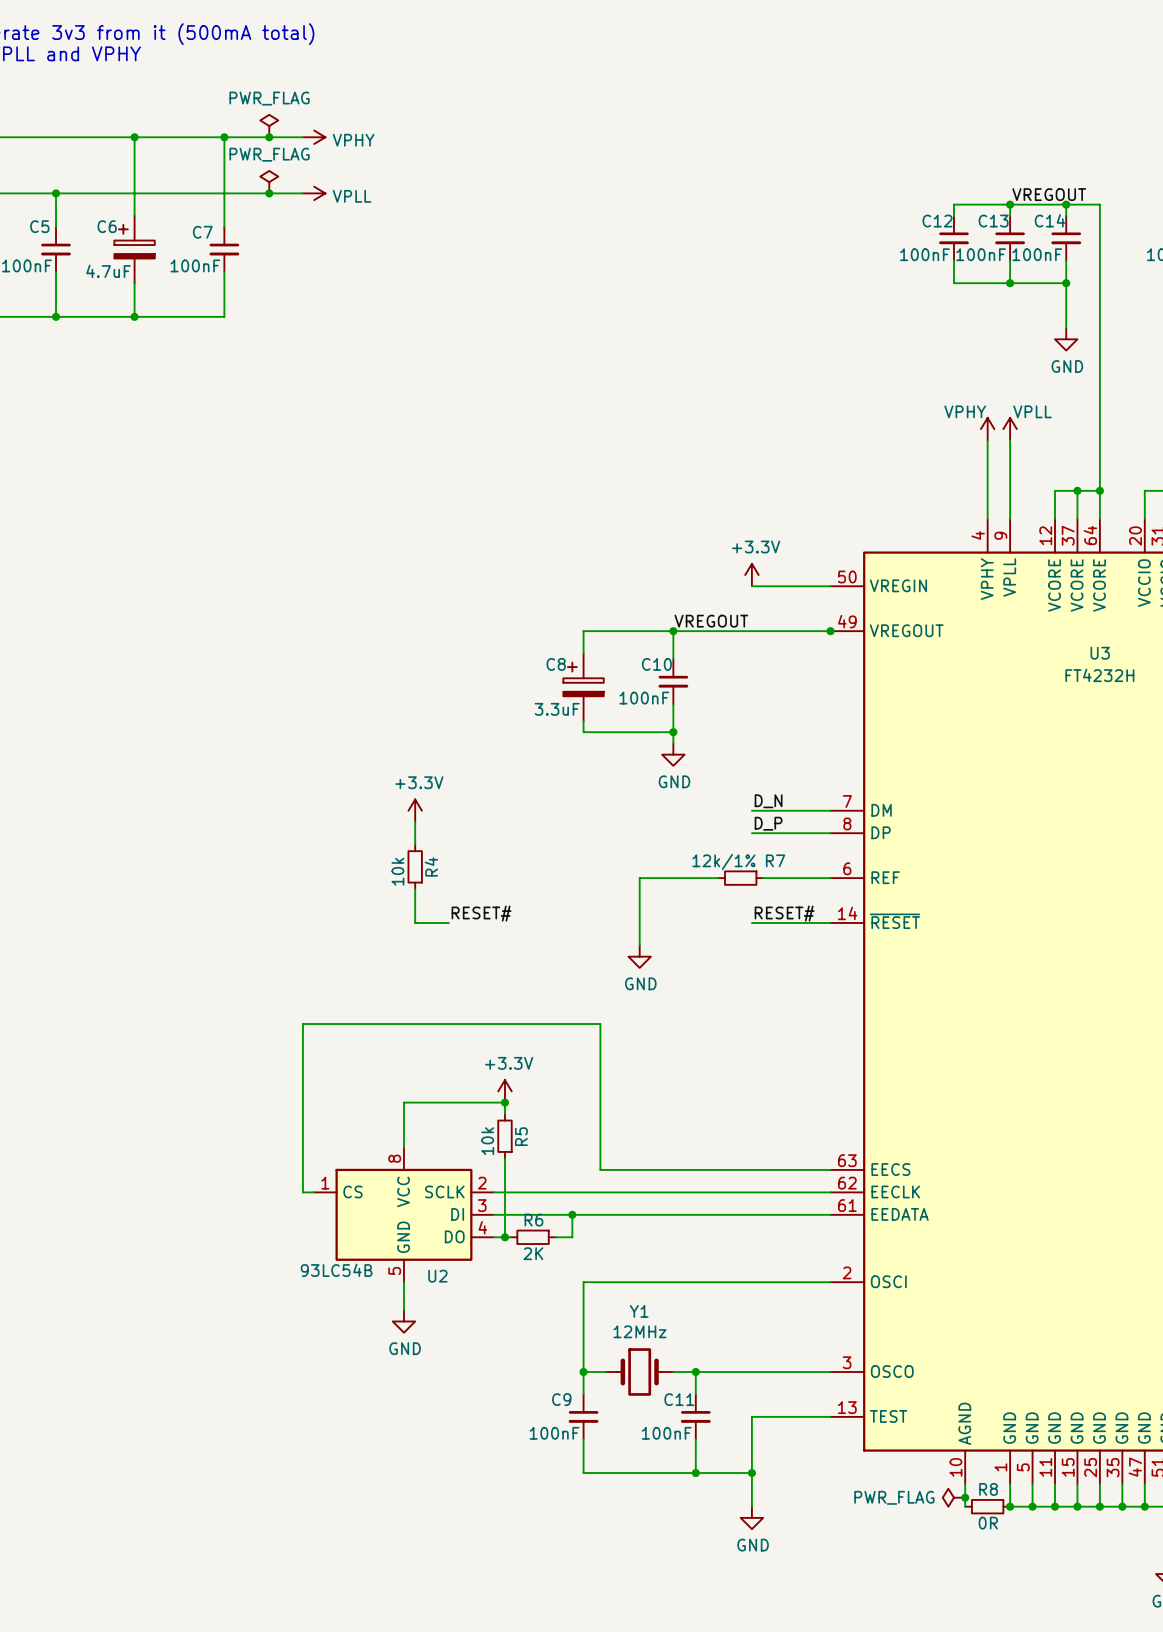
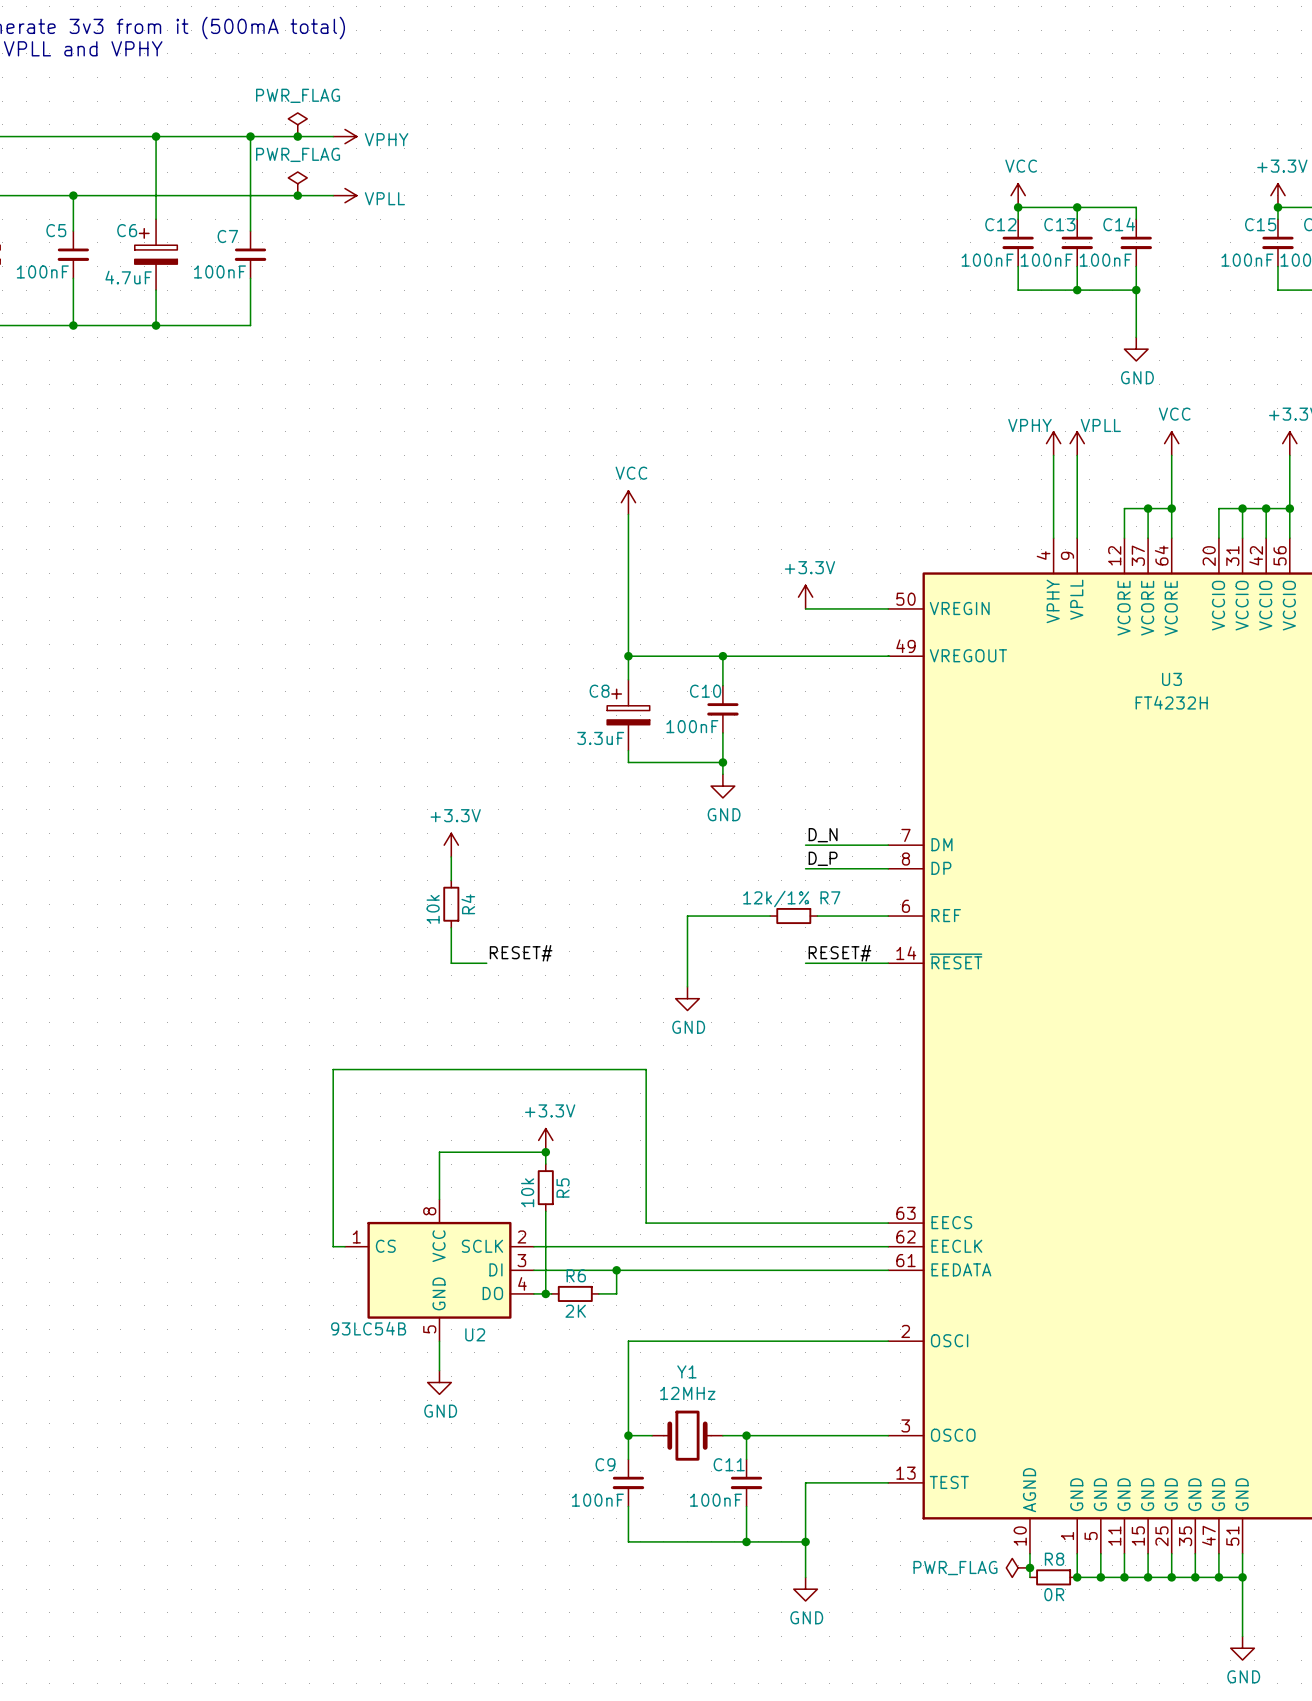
power symbol: none -> VCC (1018, 195)
label: VREGOUT (1049, 194) -> none
junction: none -> (1018, 207)
wire: (1066, 204) (1099, 204) (1099, 440) -> none
junction: (1066, 204) -> none
power symbol: none -> VCC (1171, 443)
power symbol: none -> VCC (628, 502)
wire: none -> (628, 514) (628, 656)
label: VREGOUT (711, 621) -> none
junction: none -> (628, 656)
junction: (830, 631) -> none

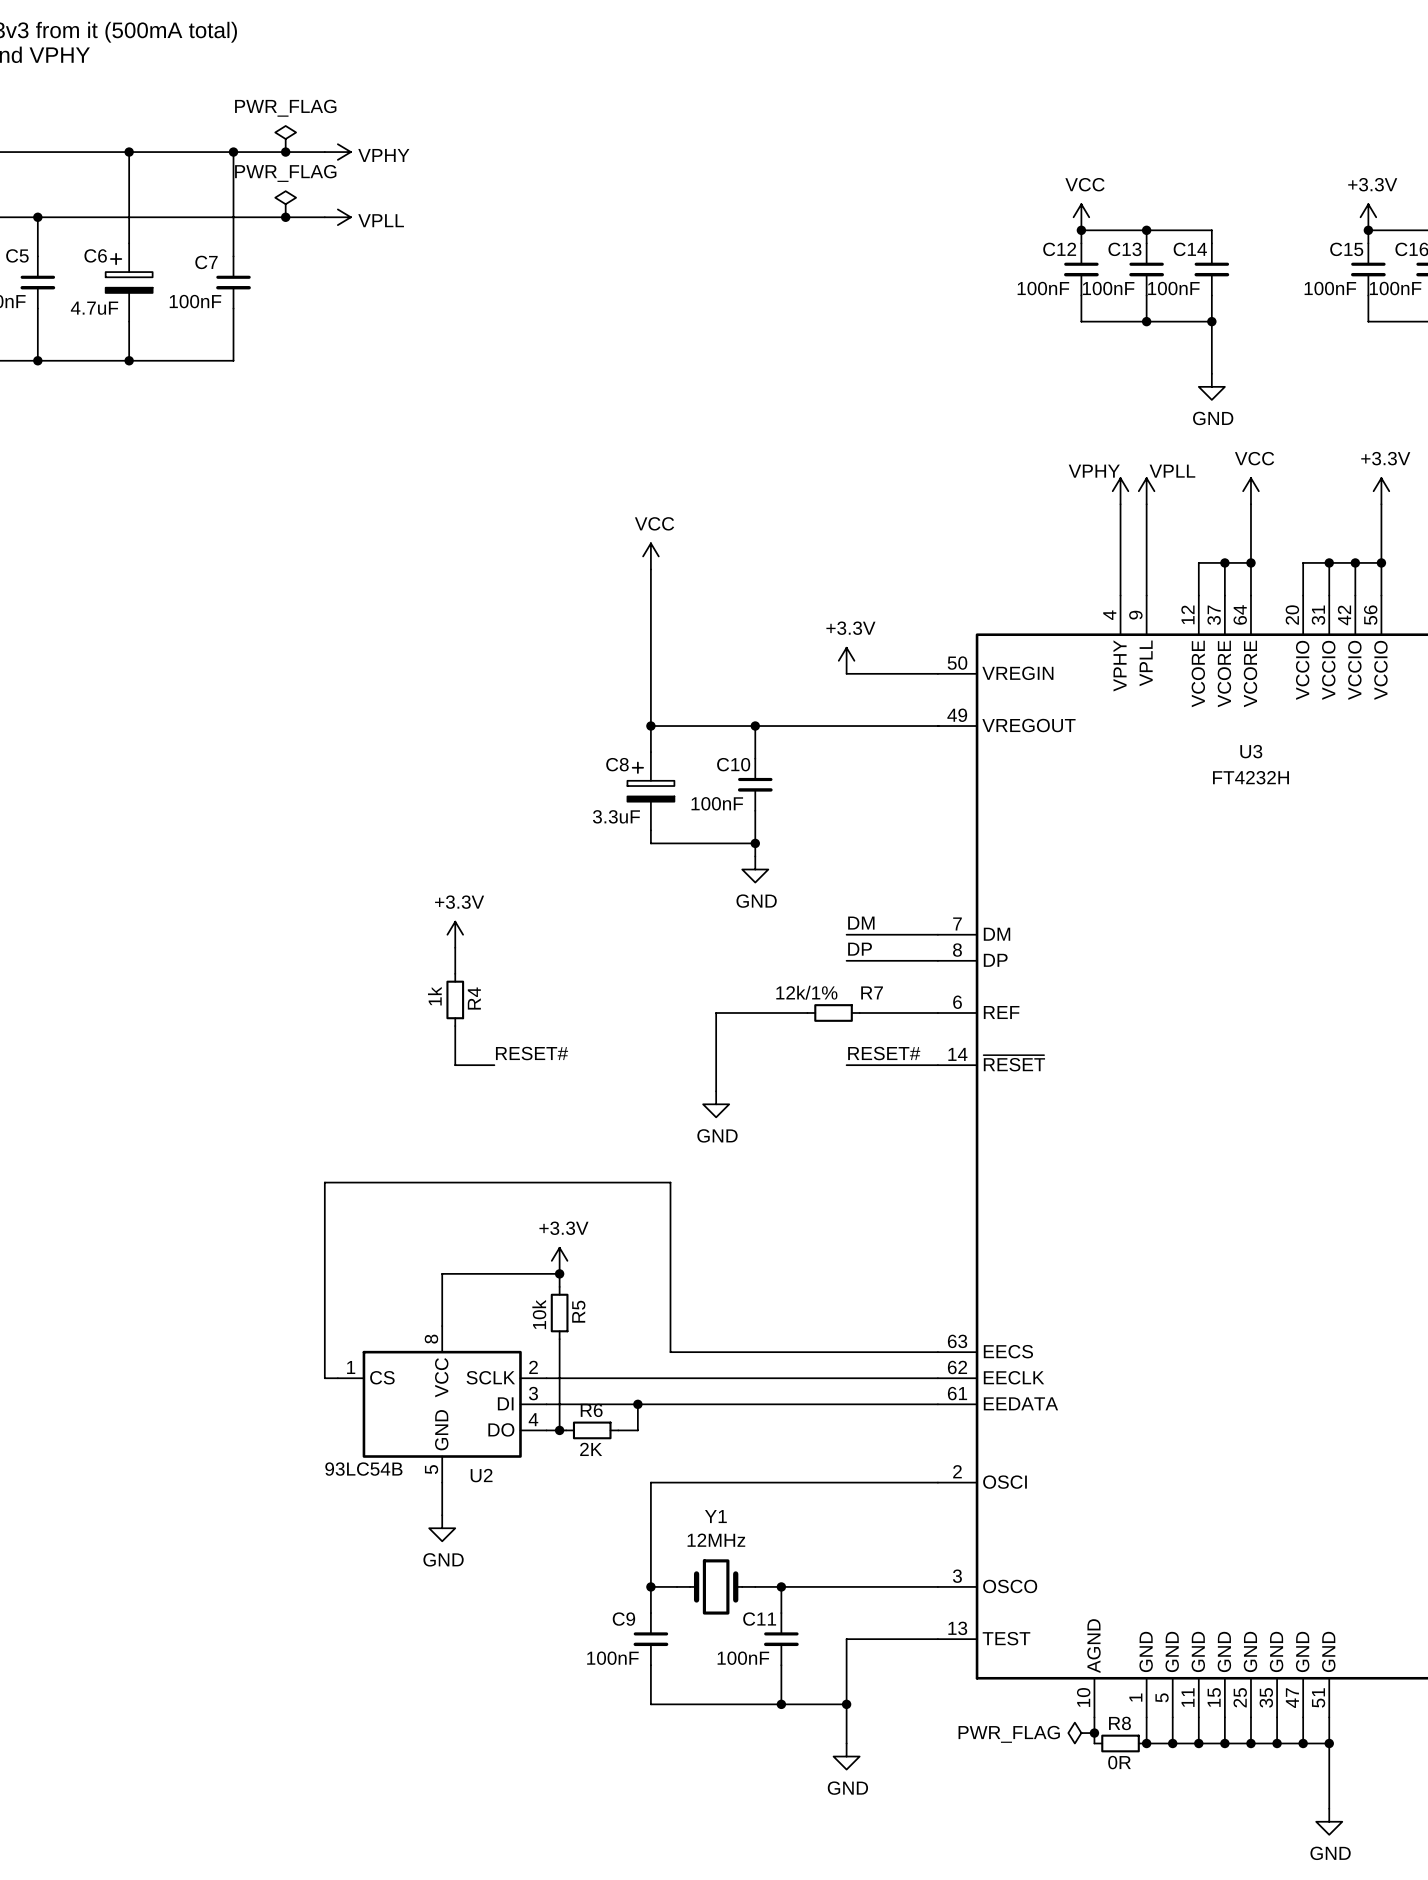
label: D_N (823, 835) -> DM (861, 923)
label: D_P (823, 858) -> DP (860, 949)
R4 value: 10k (433, 909) -> 1k (434, 996)

